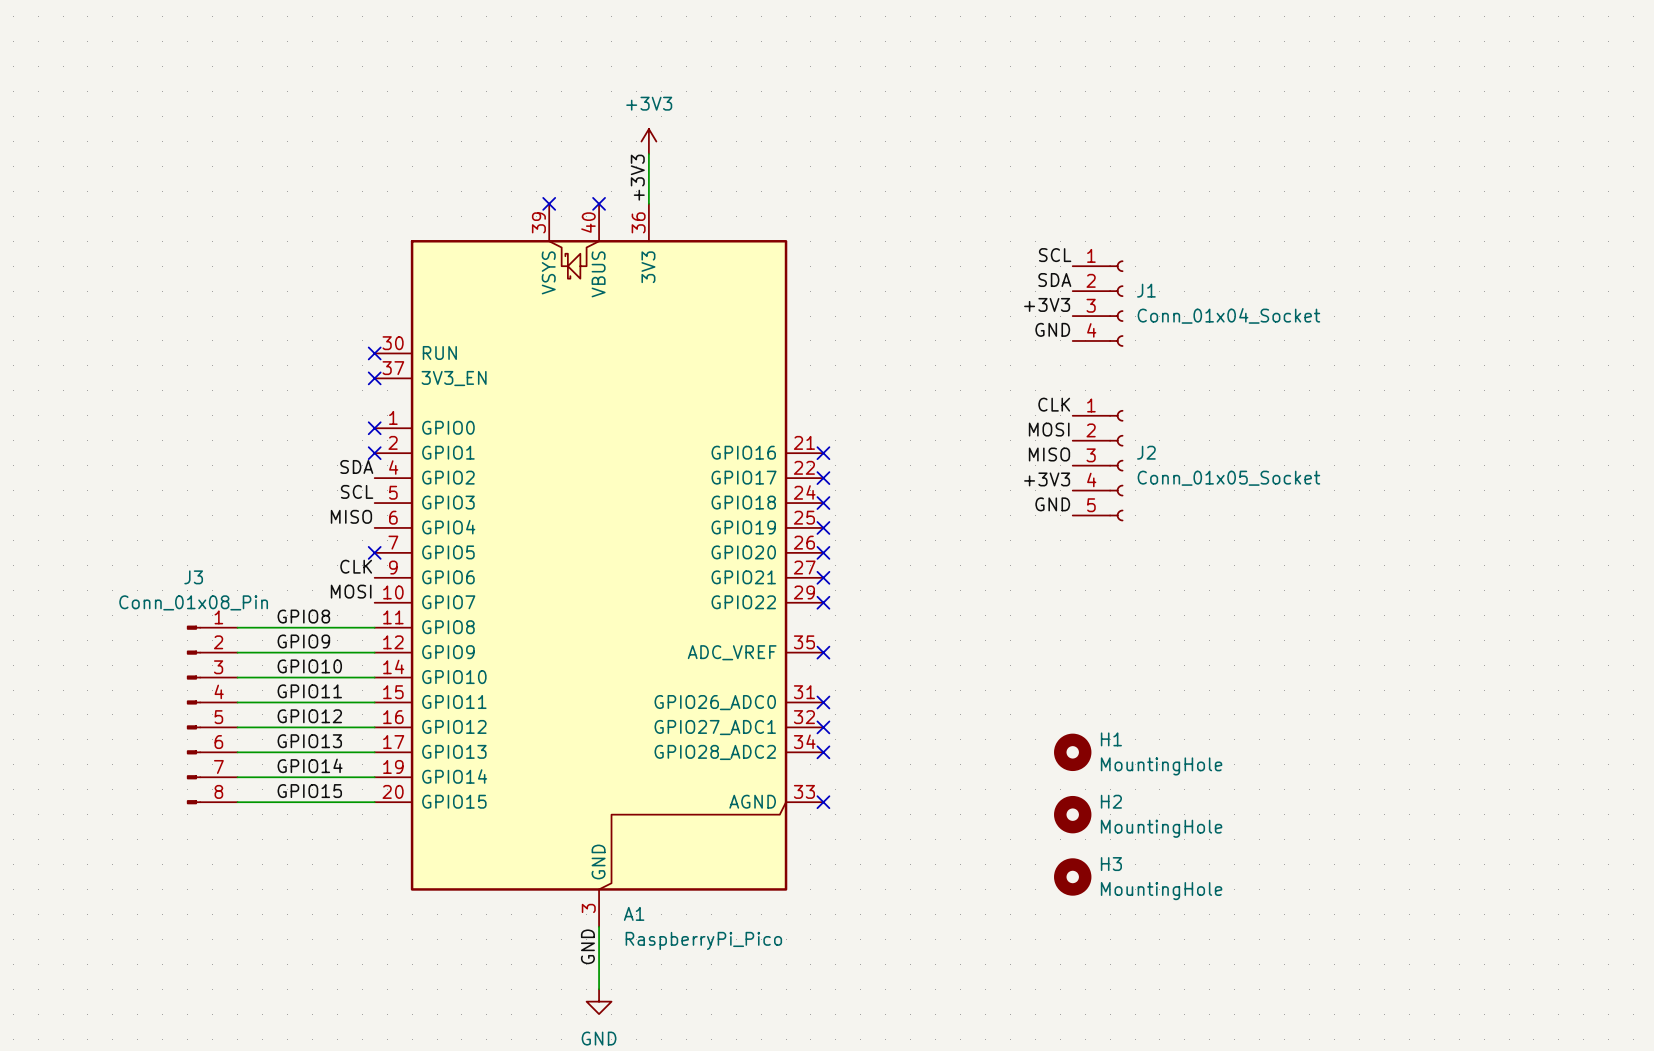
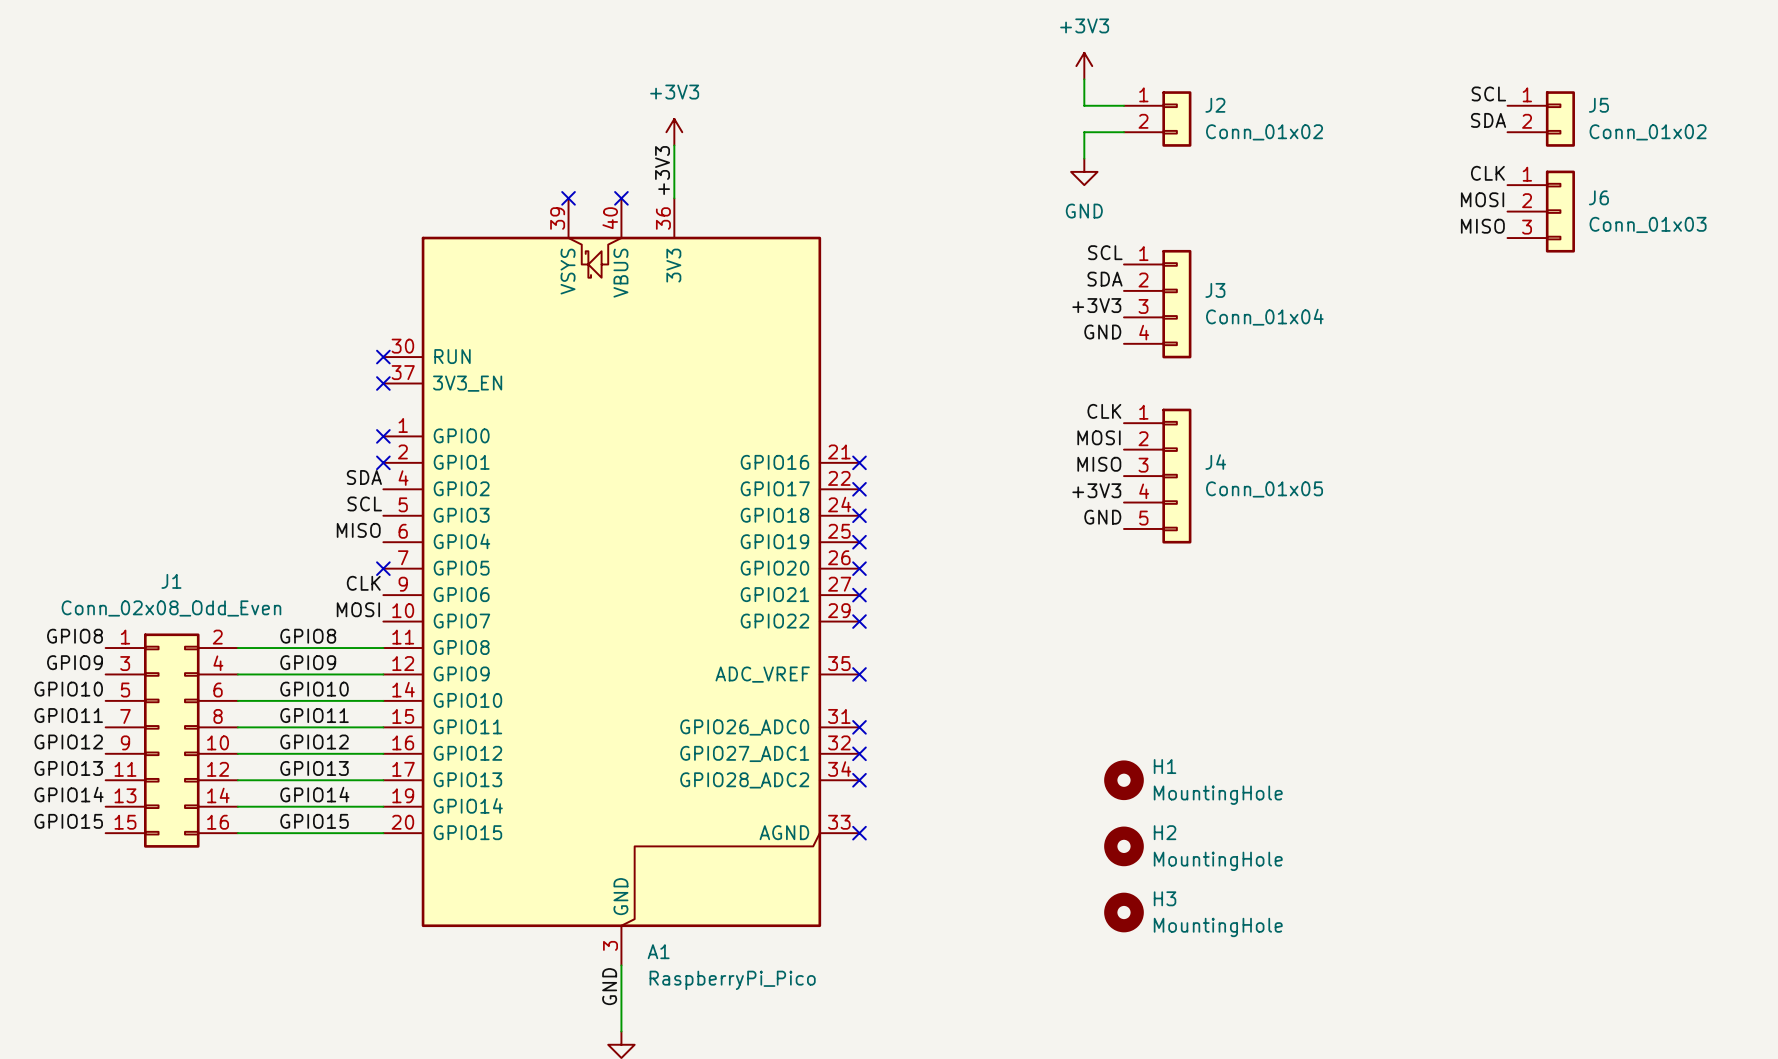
power symbol: none -> +3V3 (1084, 66)
wire: none -> (1084, 79) (1084, 105) (1123, 105)
label: none -> SCL (1488, 93)
J5: none -> Conn_01x02 (1541, 119)
label: none -> SDA (1488, 120)
wire: none -> (1123, 132) (1084, 132) (1084, 158)
power symbol: none -> GND (1084, 171)
label: none -> CLK (1487, 173)
label: none -> MOSI (1482, 199)
J6: none -> Conn_01x03 (1541, 211)
label: none -> MISO (1482, 226)
J1 symbol: [1072, 260, 1124, 347] -> [105, 633, 238, 848]
J1 name position: J1 (1146, 290) -> J1 (171, 581)
J1 value: Conn_01x04_Socket (1228, 315) -> Conn_02x08_Odd_Even (171, 608)
J2 symbol: [1072, 410, 1124, 522] -> [1123, 91, 1192, 147]
J4: none -> Conn_01x05 (1157, 476)
J2 value: Conn_01x05_Socket (1228, 478) -> Conn_01x02 (1264, 132)
J3 name position: J3 (193, 577) -> J3 (1215, 290)
J3 value: Conn_01x08_Pin (193, 602) -> Conn_01x04 (1264, 317)
label: none -> GPIO8 (75, 636)
J3 symbol: [186, 625, 238, 805] -> [1123, 249, 1192, 359]
label: none -> GPIO9 (75, 662)
label: none -> GPIO10 (68, 689)
label: none -> GPIO11 (68, 715)
label: none -> GPIO12 (68, 742)
label: none -> GPIO13 (68, 768)
label: none -> GPIO14 (69, 794)
label: none -> GPIO15 (68, 821)

